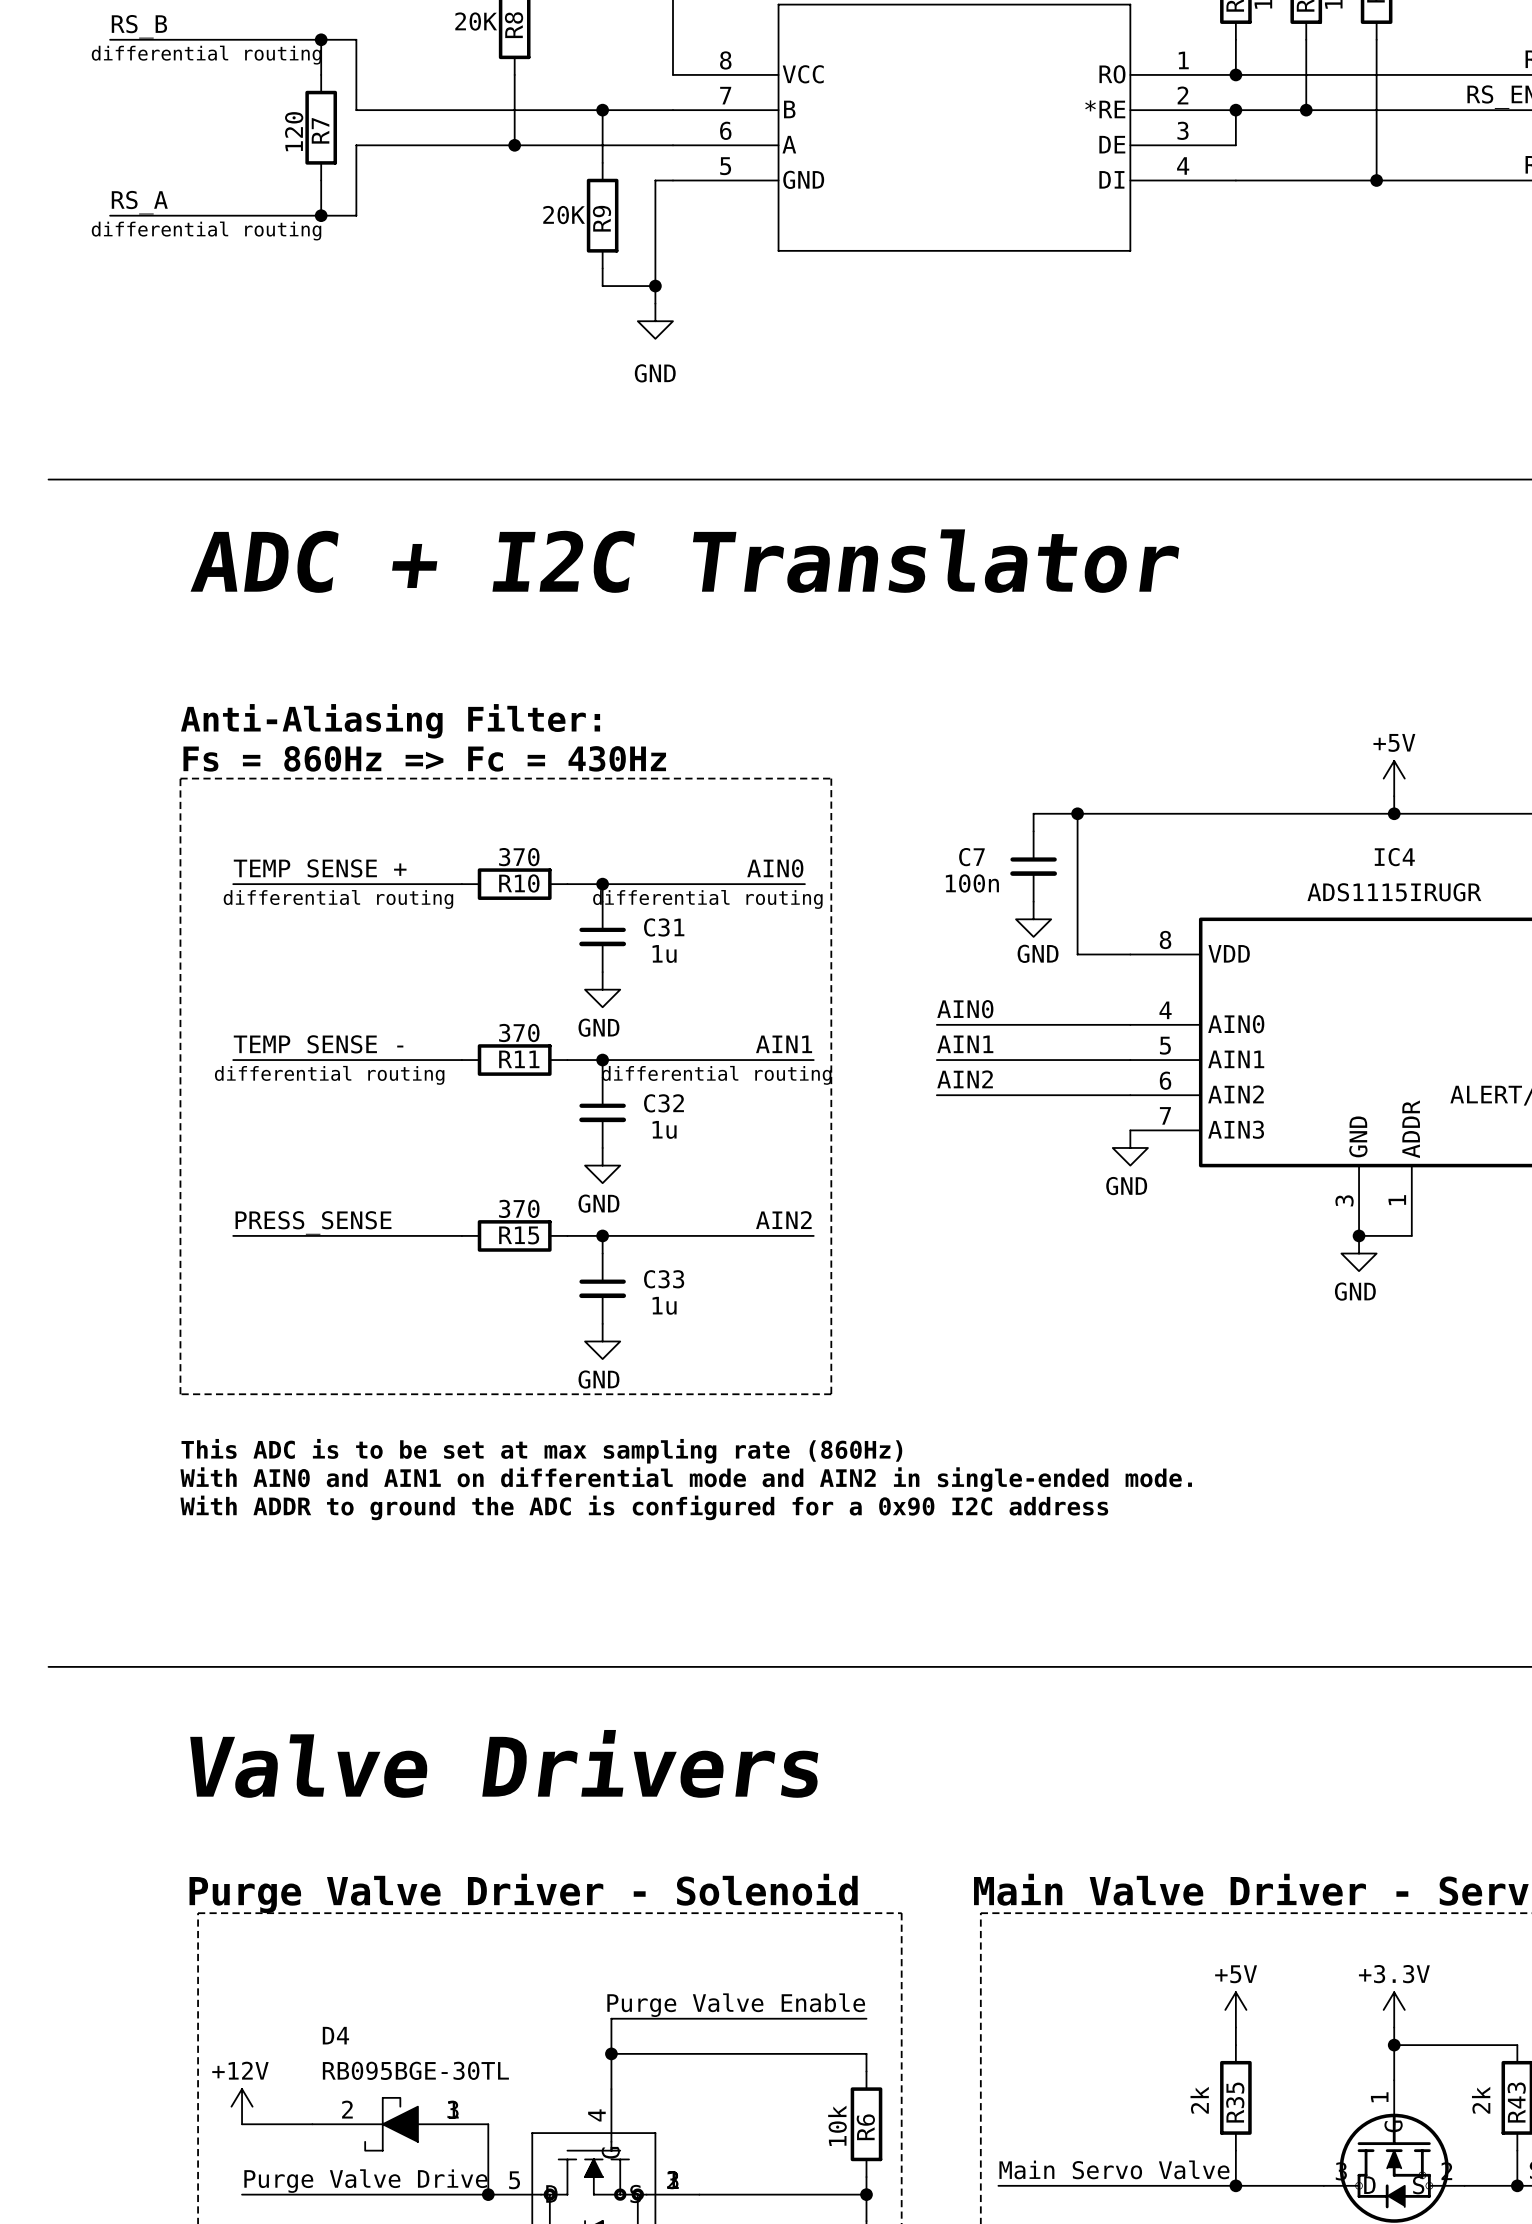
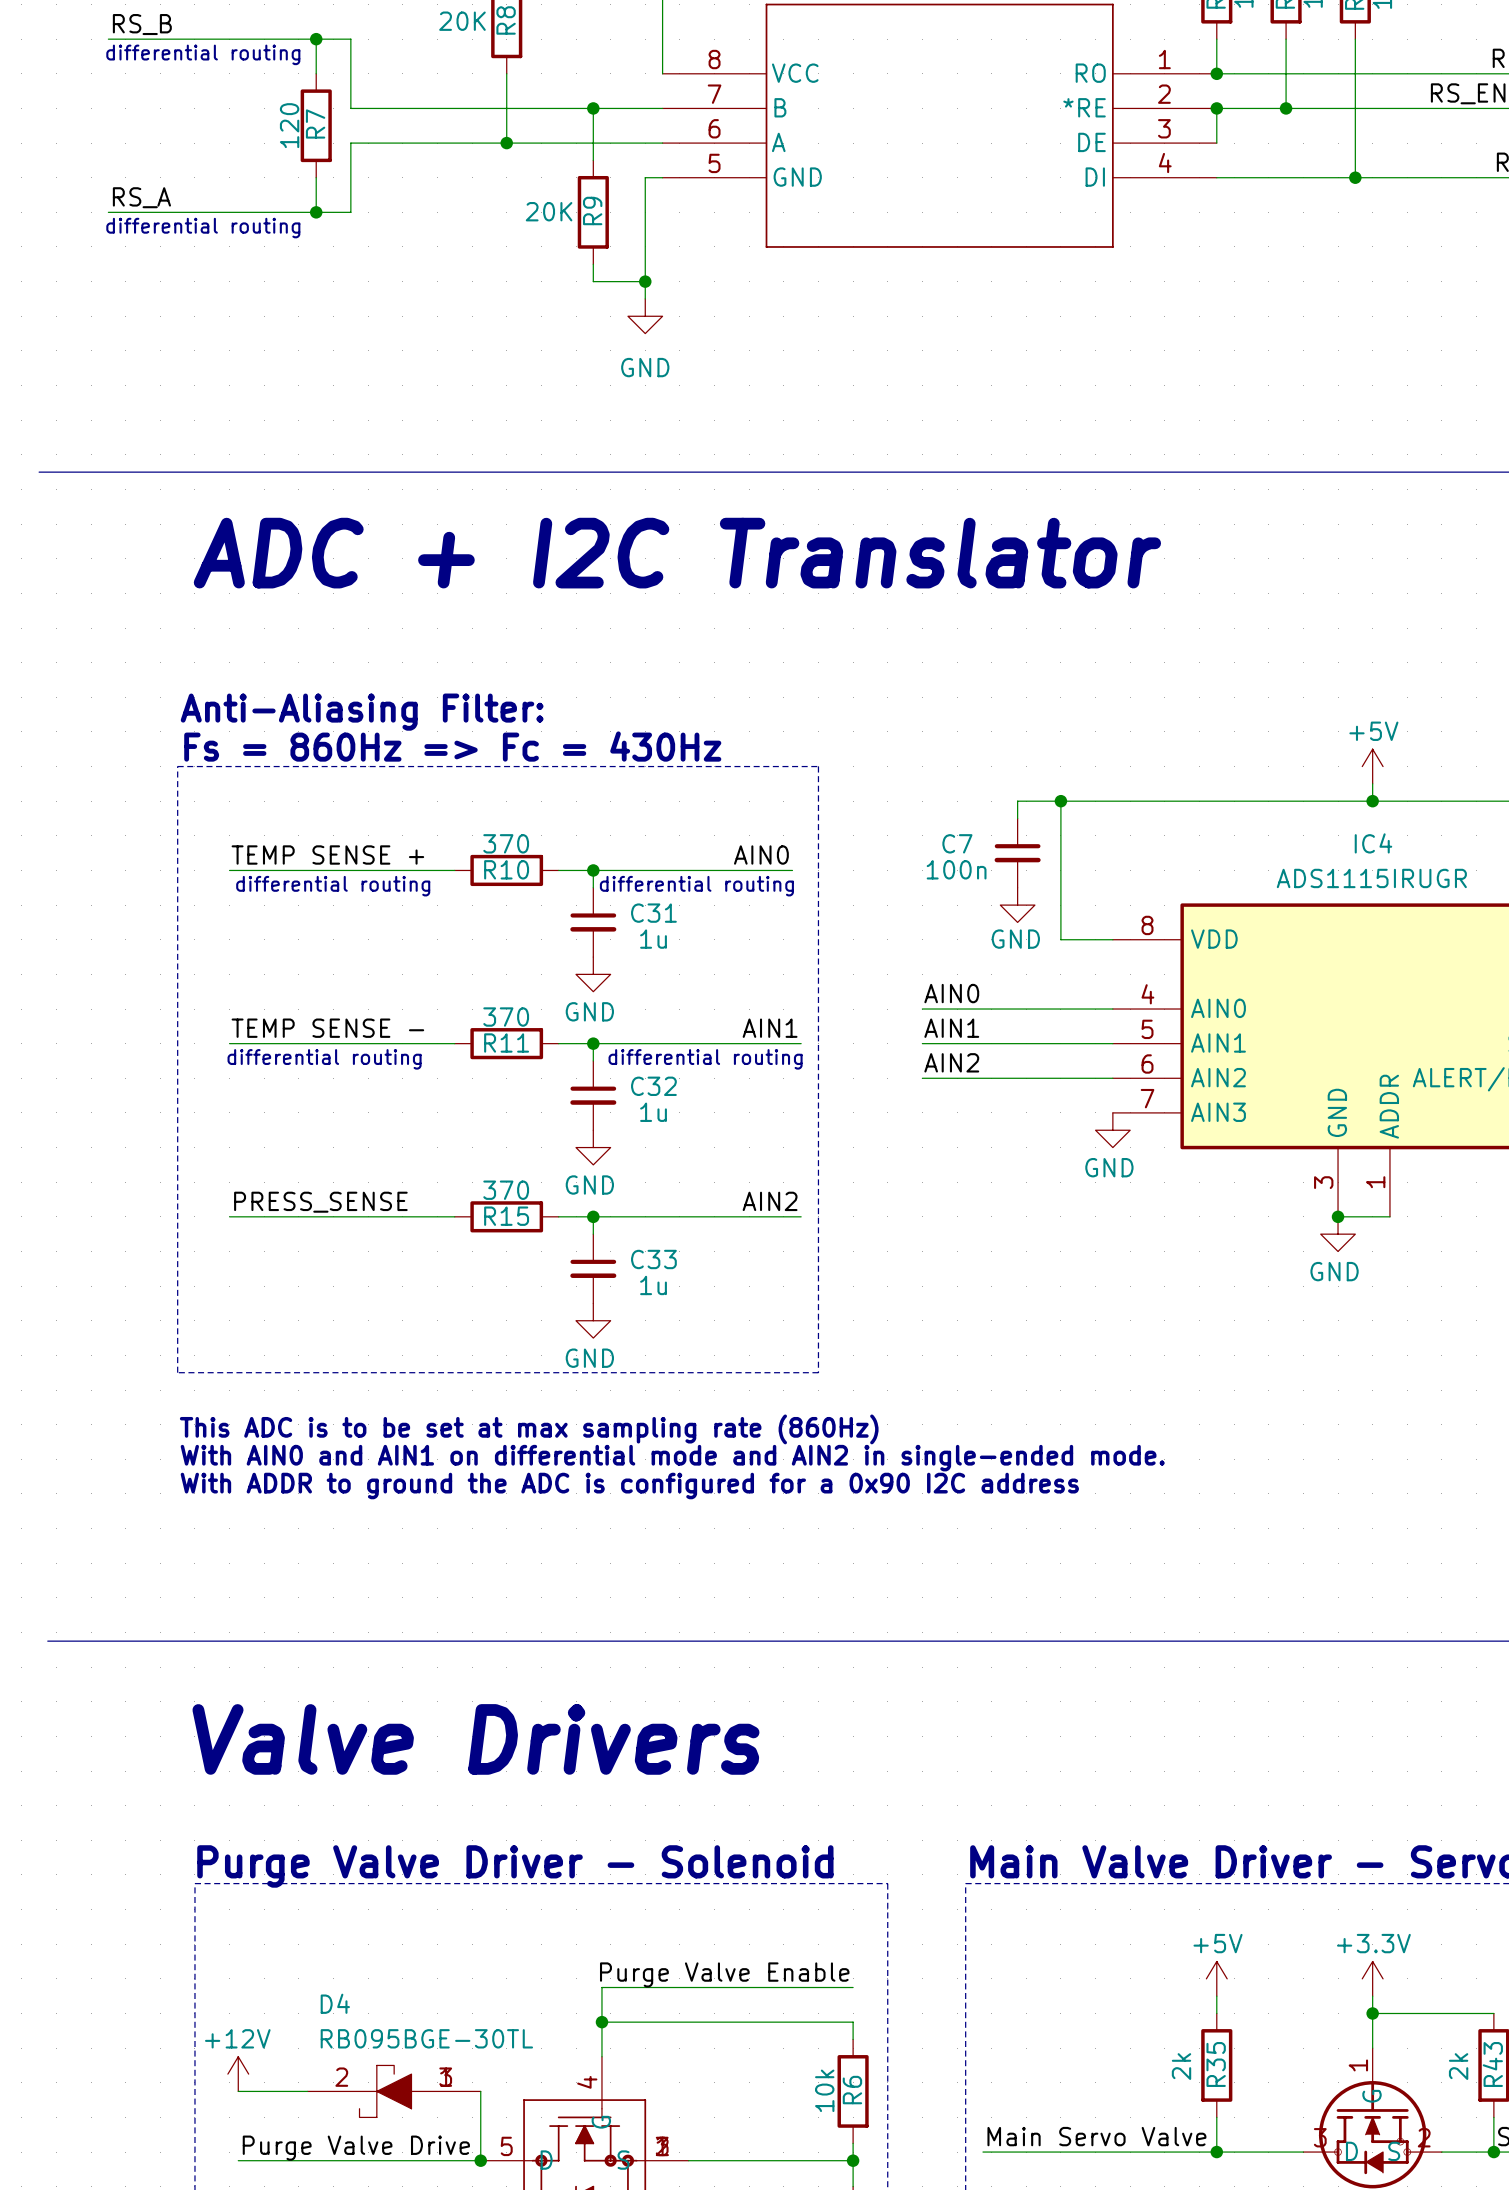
line: none -> (39, 472) (47, 472)

